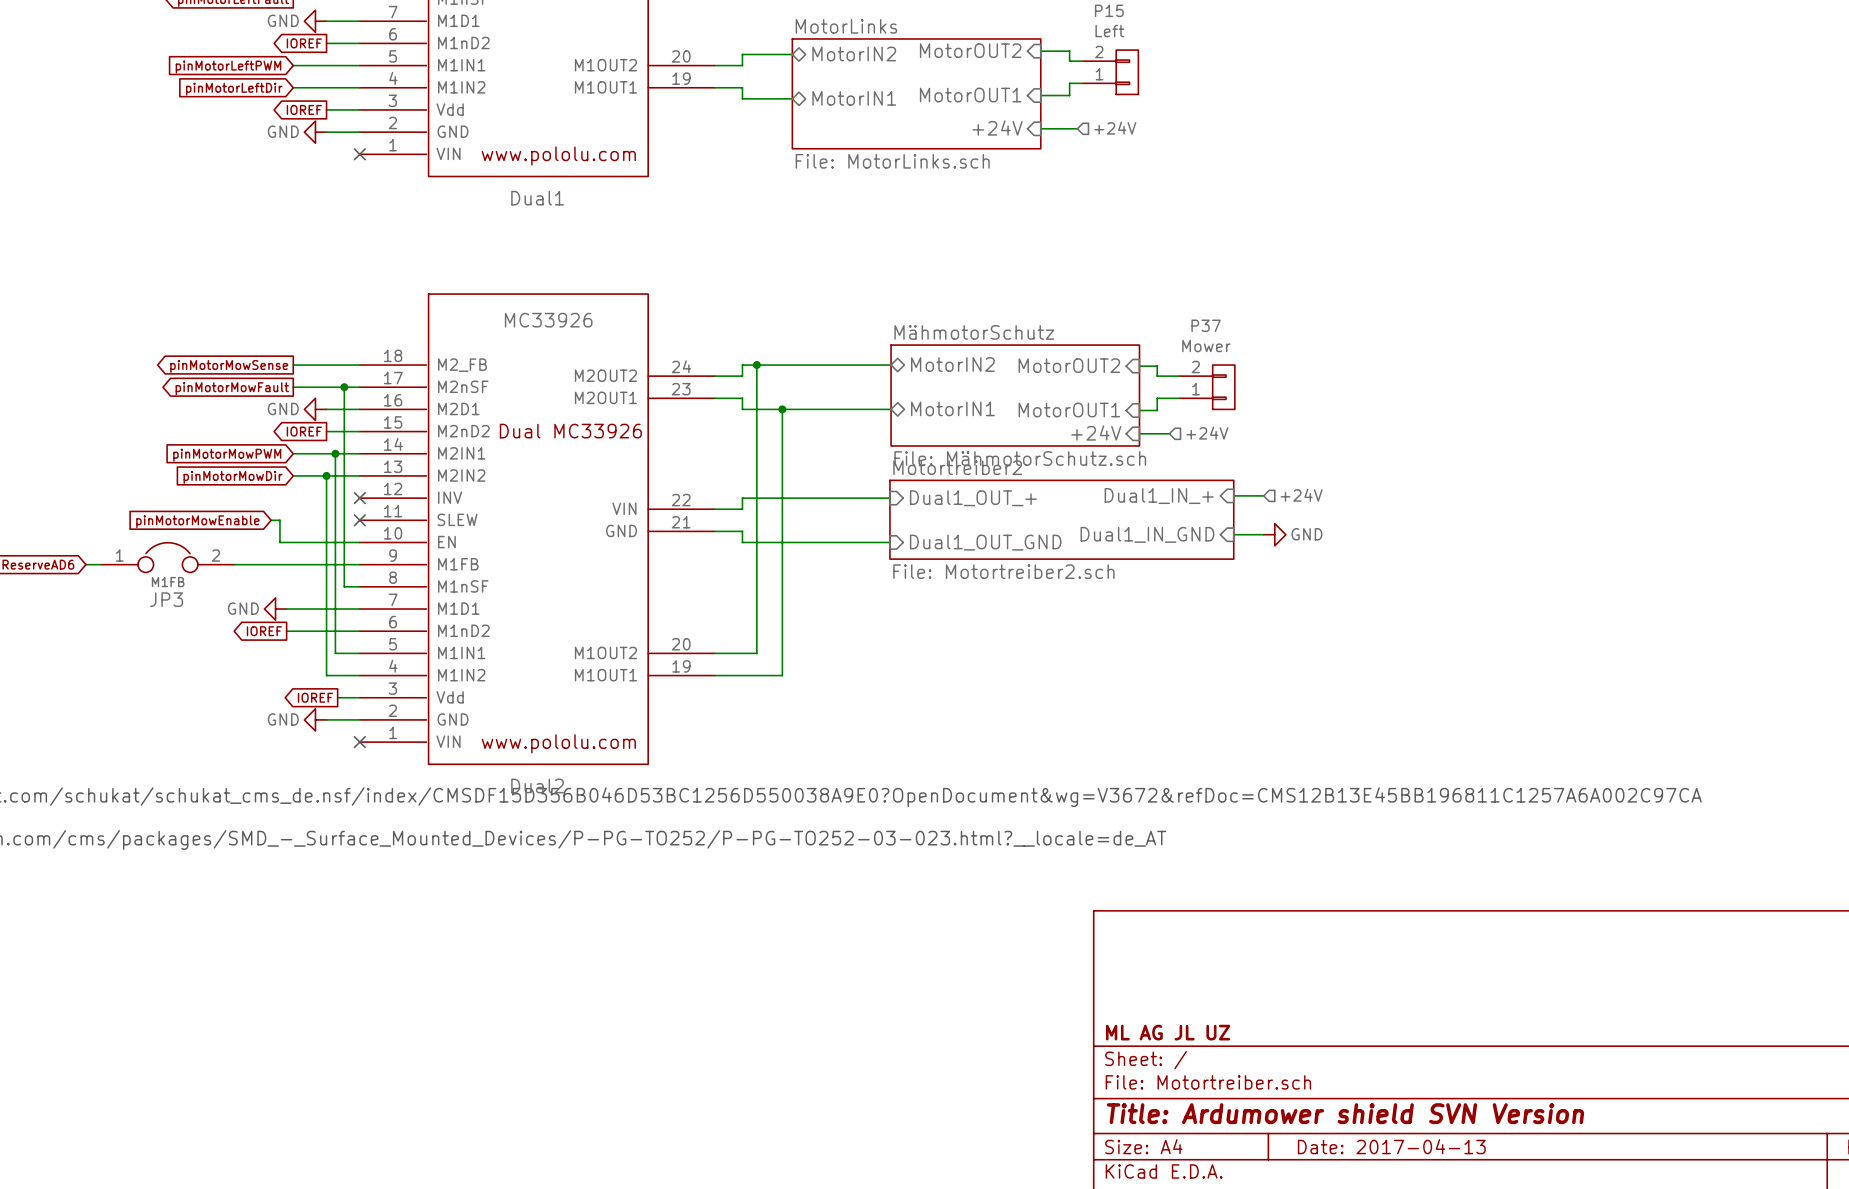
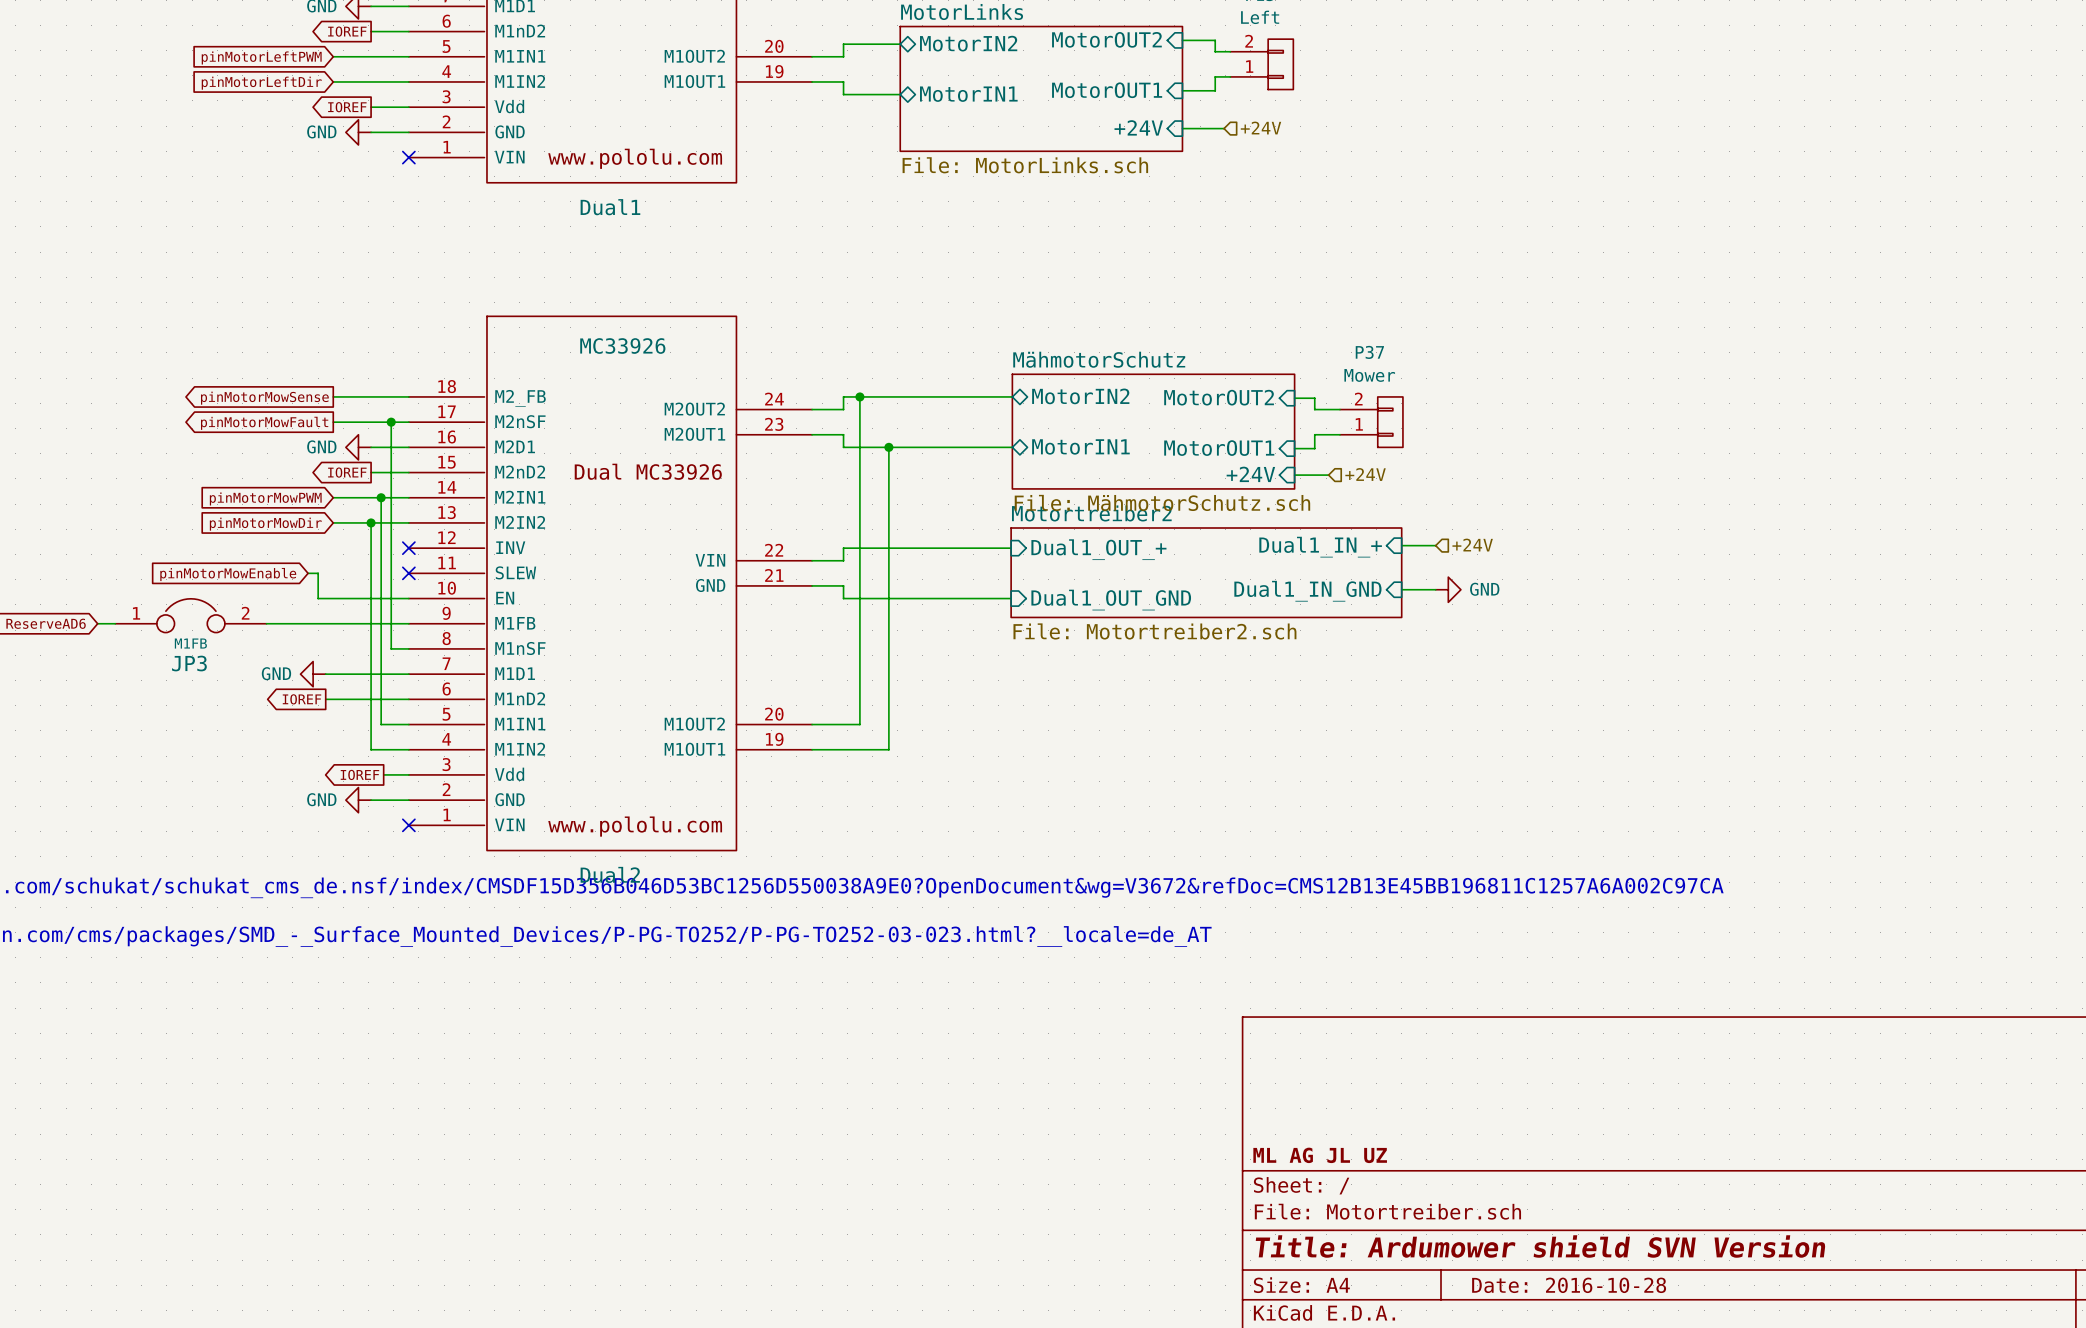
title block: Date: 2017-04-13 (1391, 1146) -> Date: 2016-10-28 (1569, 1285)

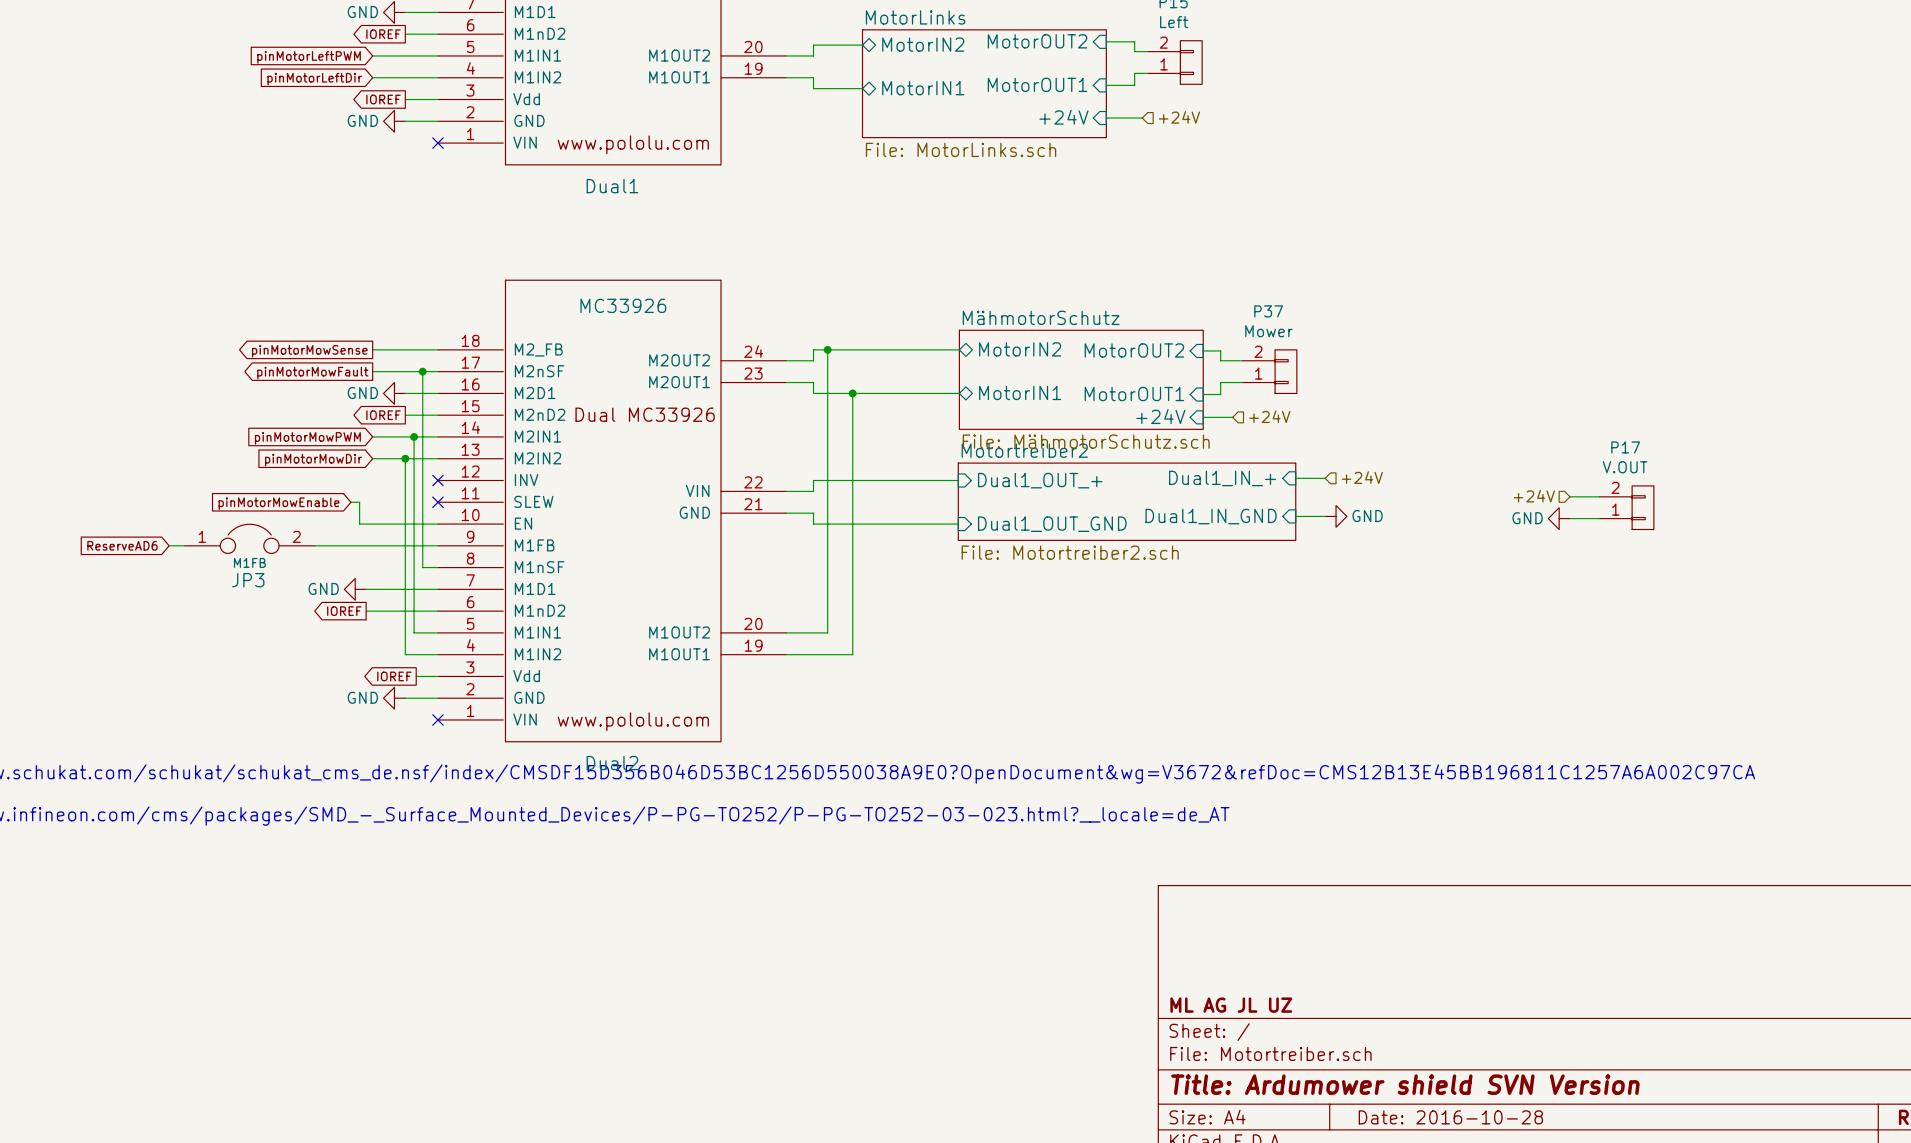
hierarchical label: none -> +24V (1534, 496)
wire: none -> (1570, 496) (1599, 496)
P17: none -> V.OUT (1626, 507)
power symbol: none -> GND (1559, 518)
wire: none -> (1570, 518) (1599, 518)

